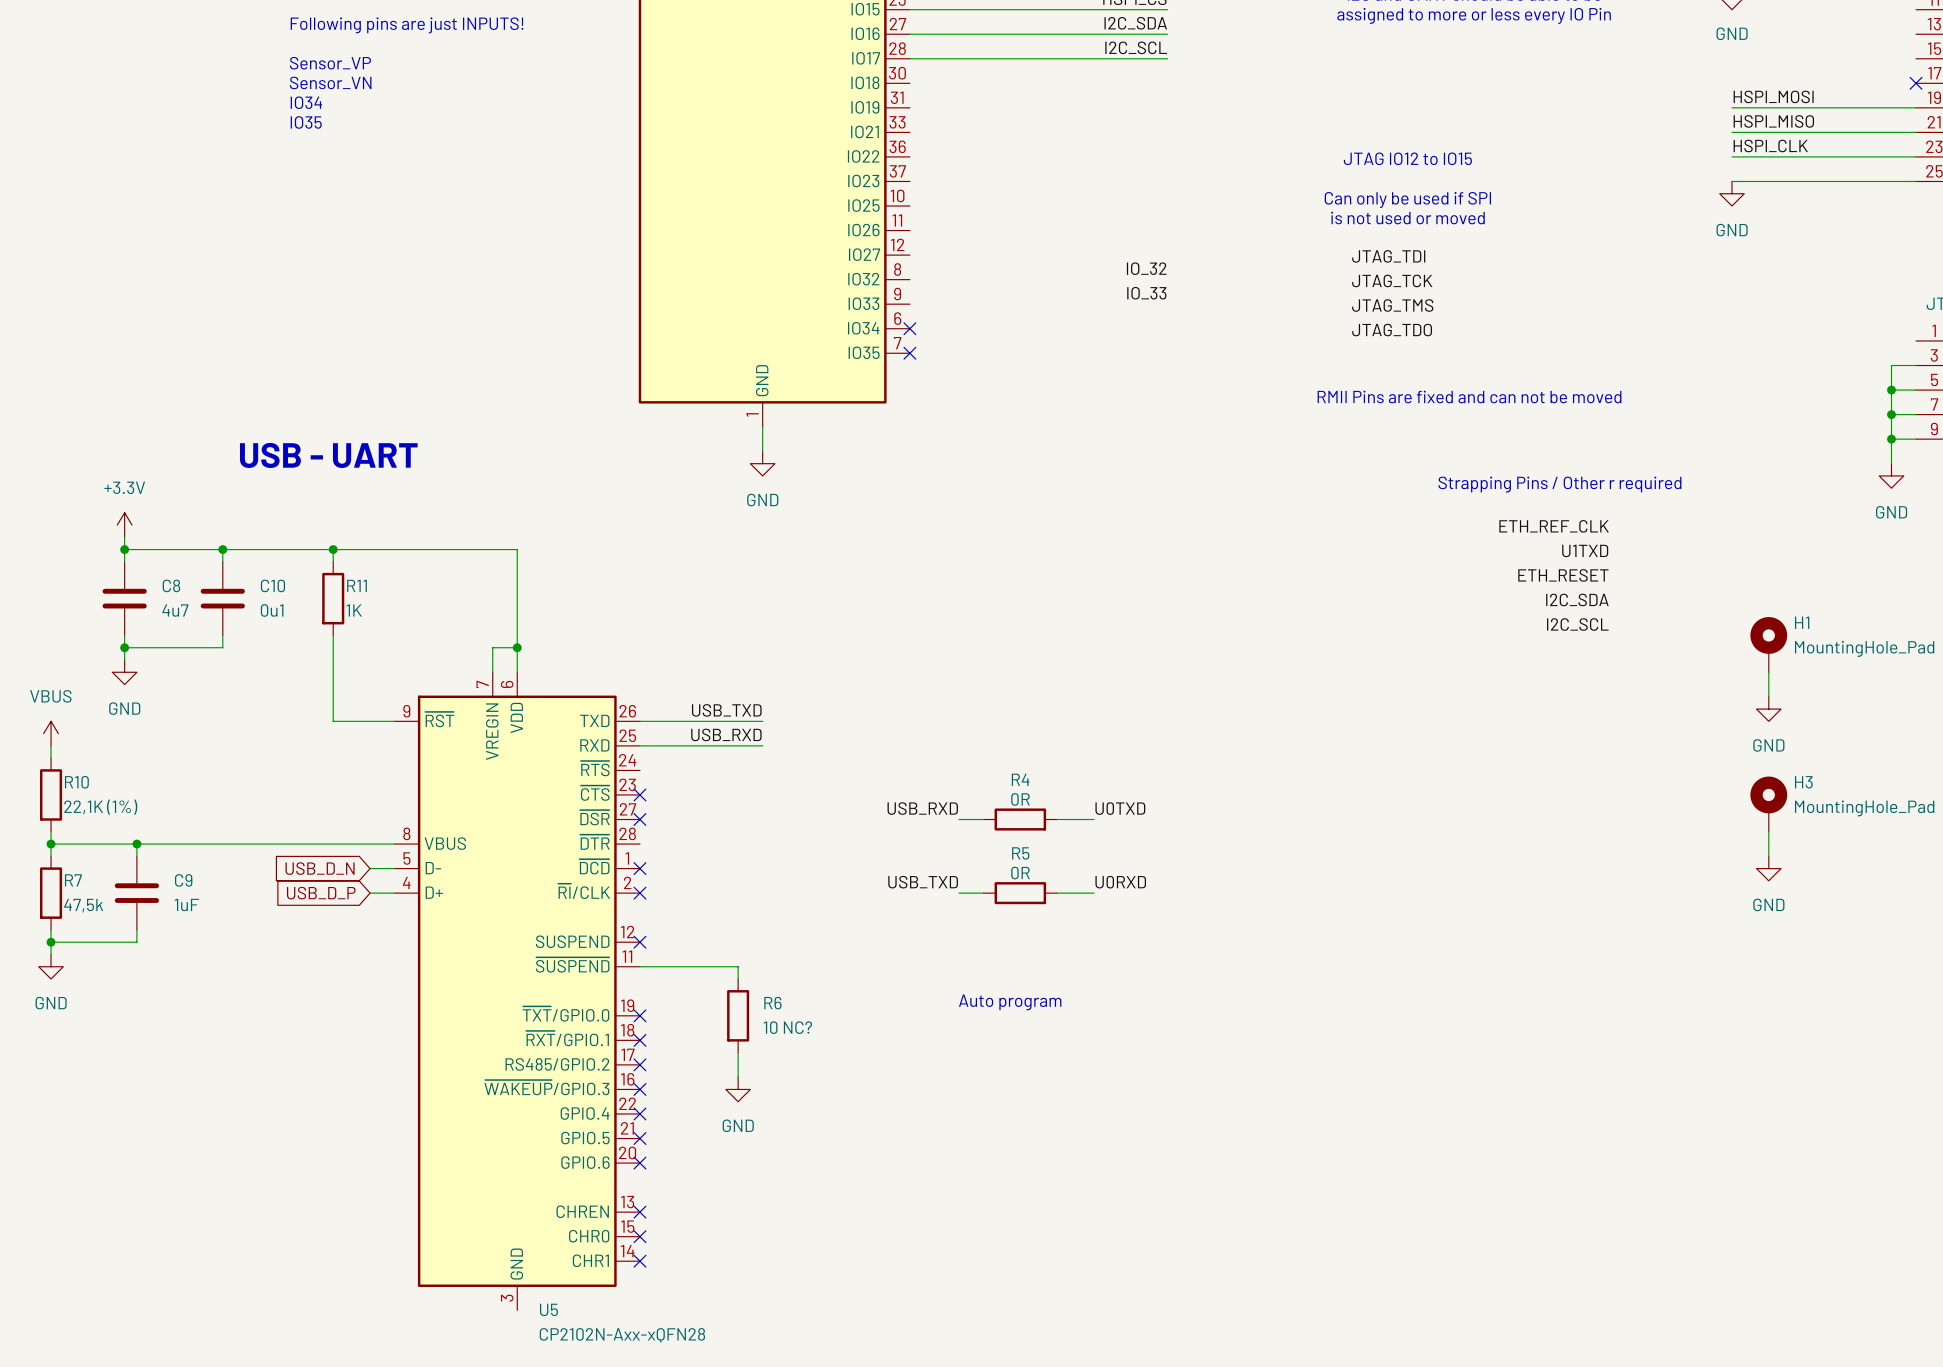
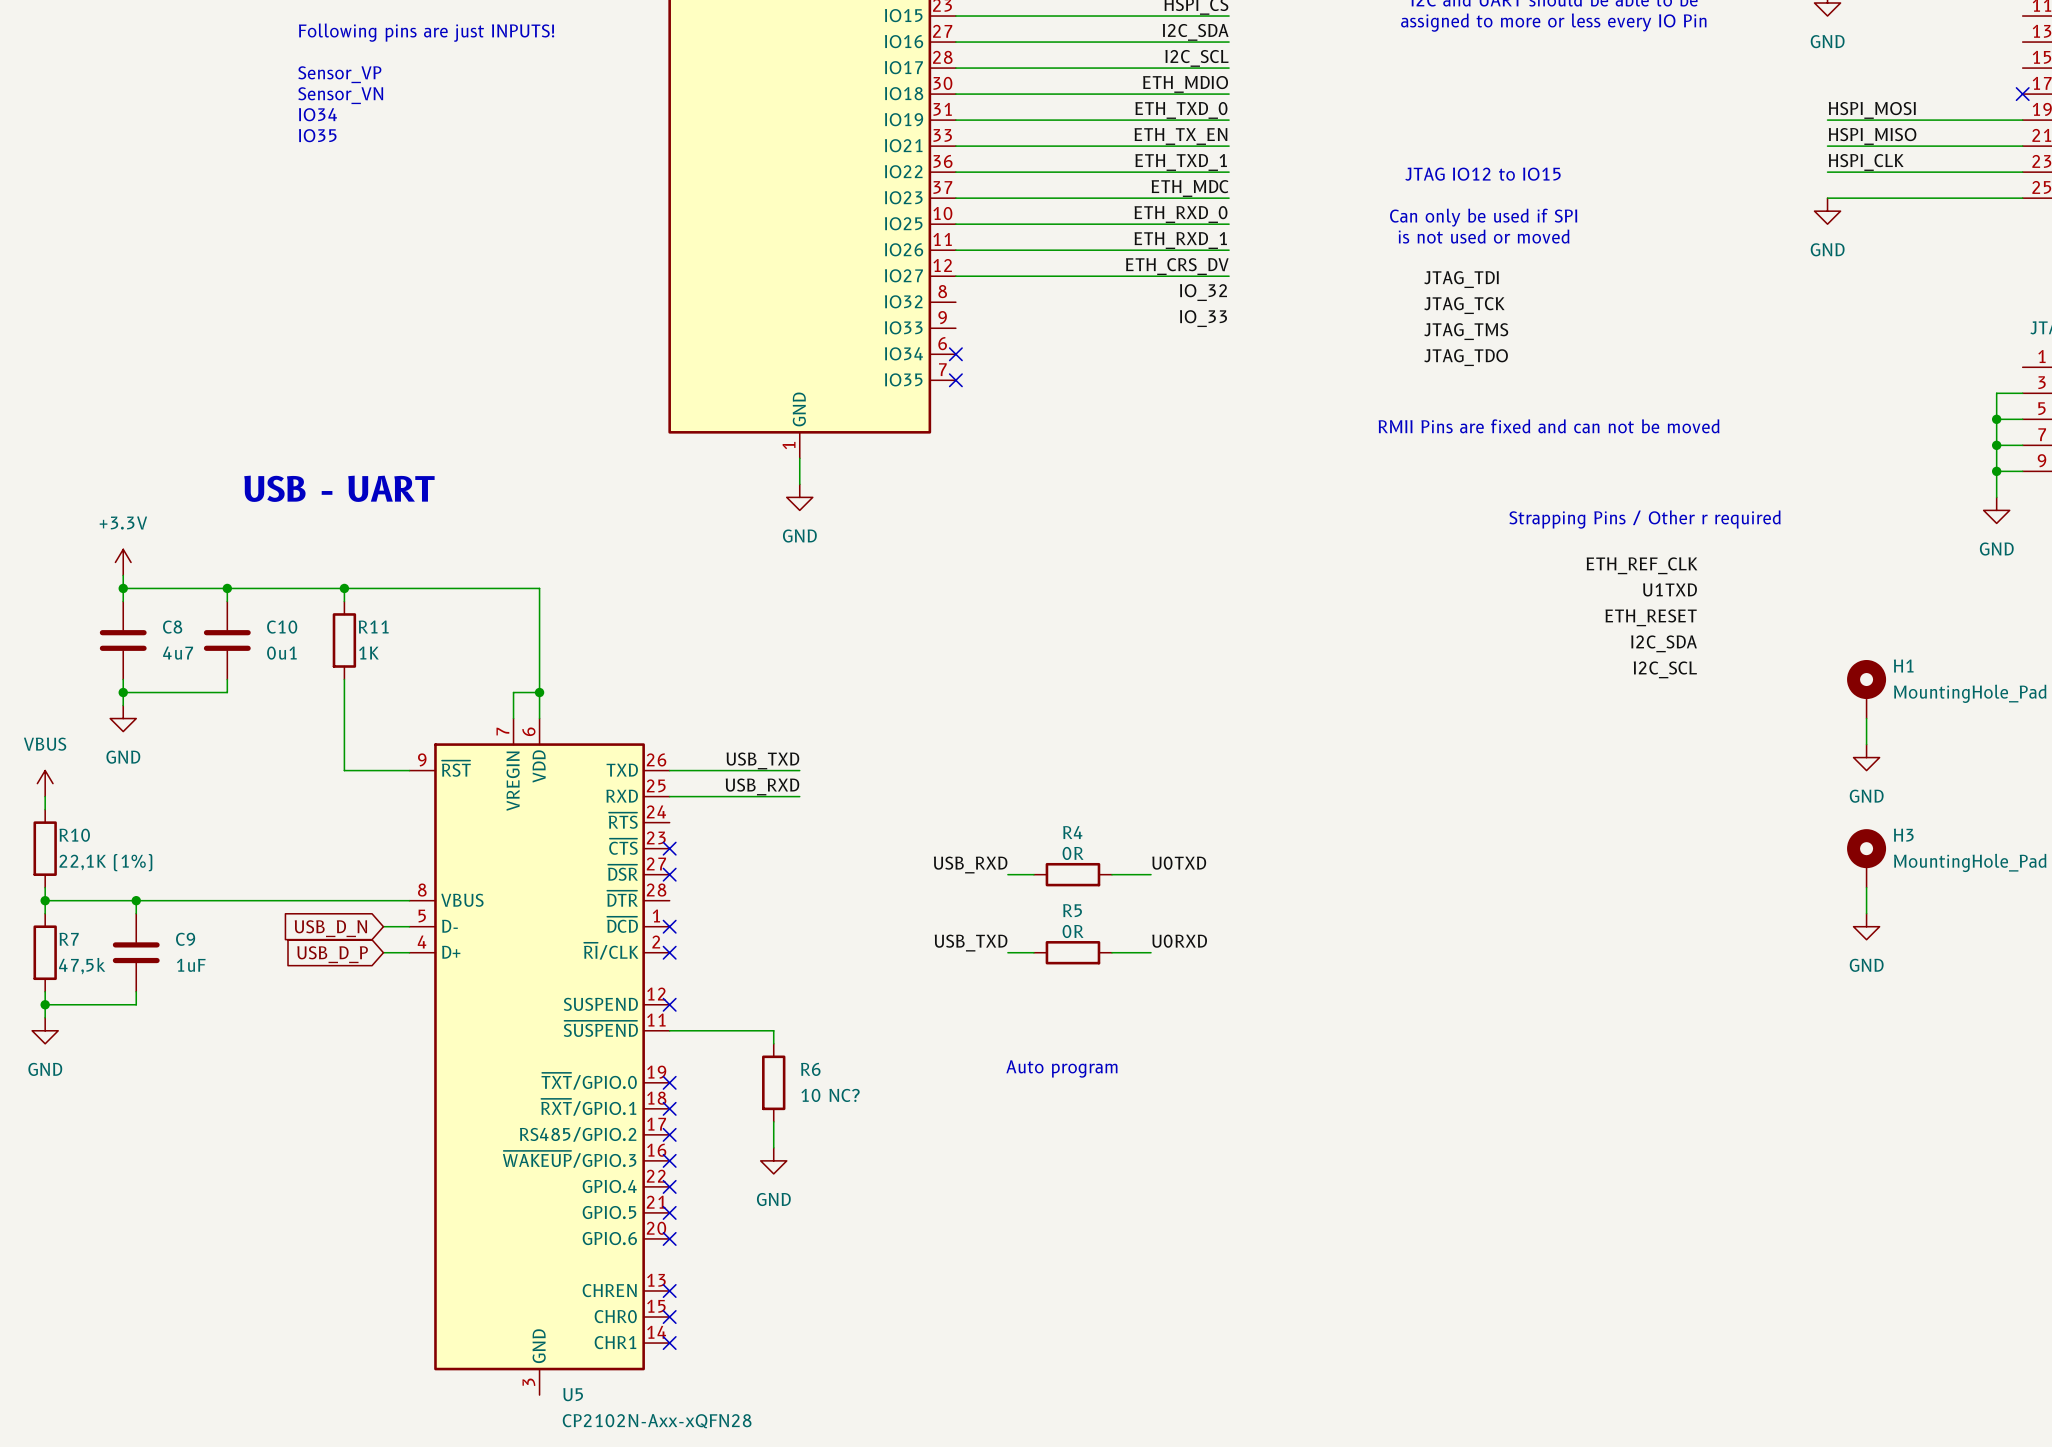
label: none -> ETH_MDIO (1185, 84)
wire: none -> (955, 94) (1229, 94)
label: none -> ETH_TXD_0 (1181, 110)
wire: none -> (955, 120) (1229, 120)
label: none -> ETH_TX_EN (1180, 136)
wire: none -> (955, 146) (1229, 146)
label: none -> ETH_TXD_1 (1181, 162)
wire: none -> (955, 172) (1229, 172)
label: none -> ETH_MDC (1190, 188)
wire: none -> (955, 198) (1229, 198)
label: none -> ETH_RXD_0 (1181, 214)
wire: none -> (955, 224) (1229, 224)
label: none -> ETH_RXD_1 (1180, 240)
wire: none -> (955, 250) (1229, 250)
label: none -> ETH_CRS_DV (1177, 266)
wire: none -> (955, 276) (1229, 276)

